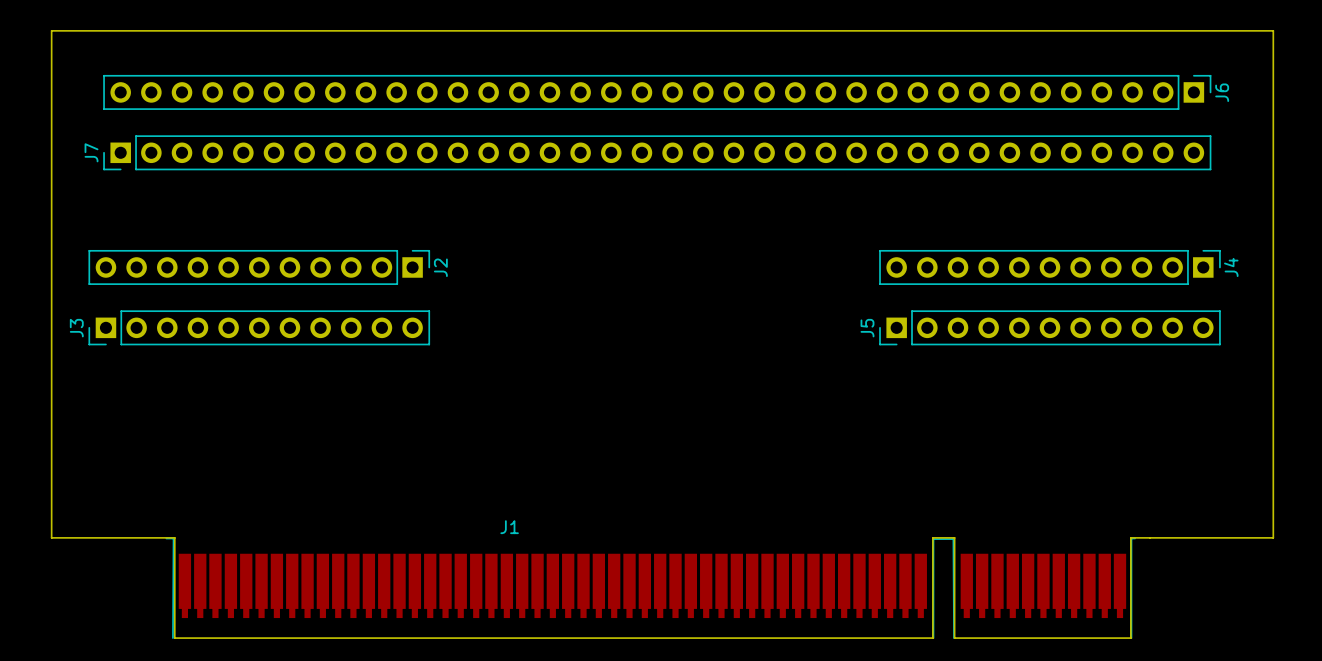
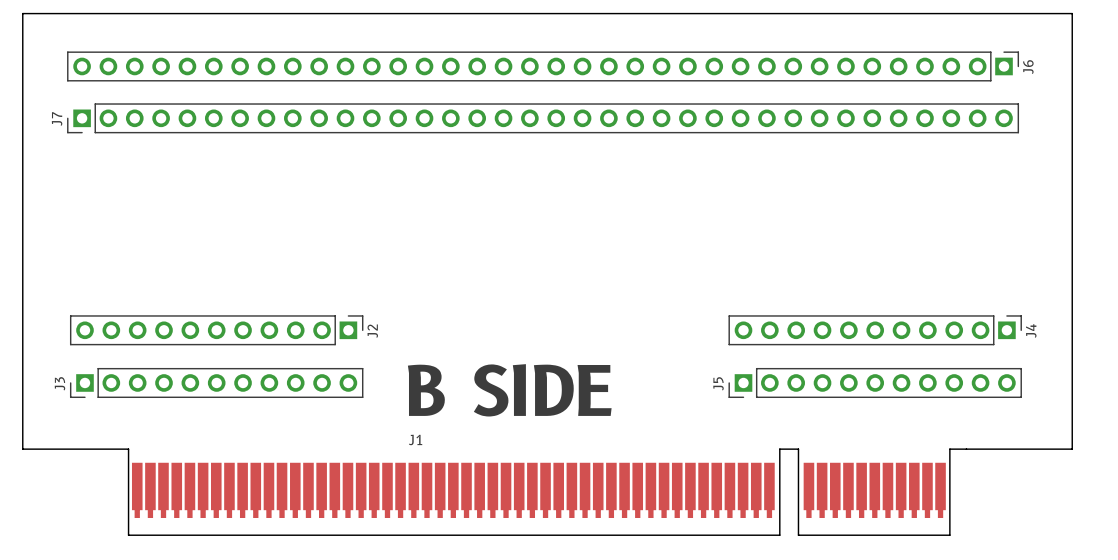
J2 position: (259, 267) -> (216, 330)
J4 position: (1049, 267) -> (875, 330)
J3 position: (259, 327) -> (216, 382)
J5 position: (1049, 327) -> (875, 382)
text: none -> B SIDE (509, 390)
J1 footprint: [165, 537, 1136, 639] -> [131, 462, 946, 518]

